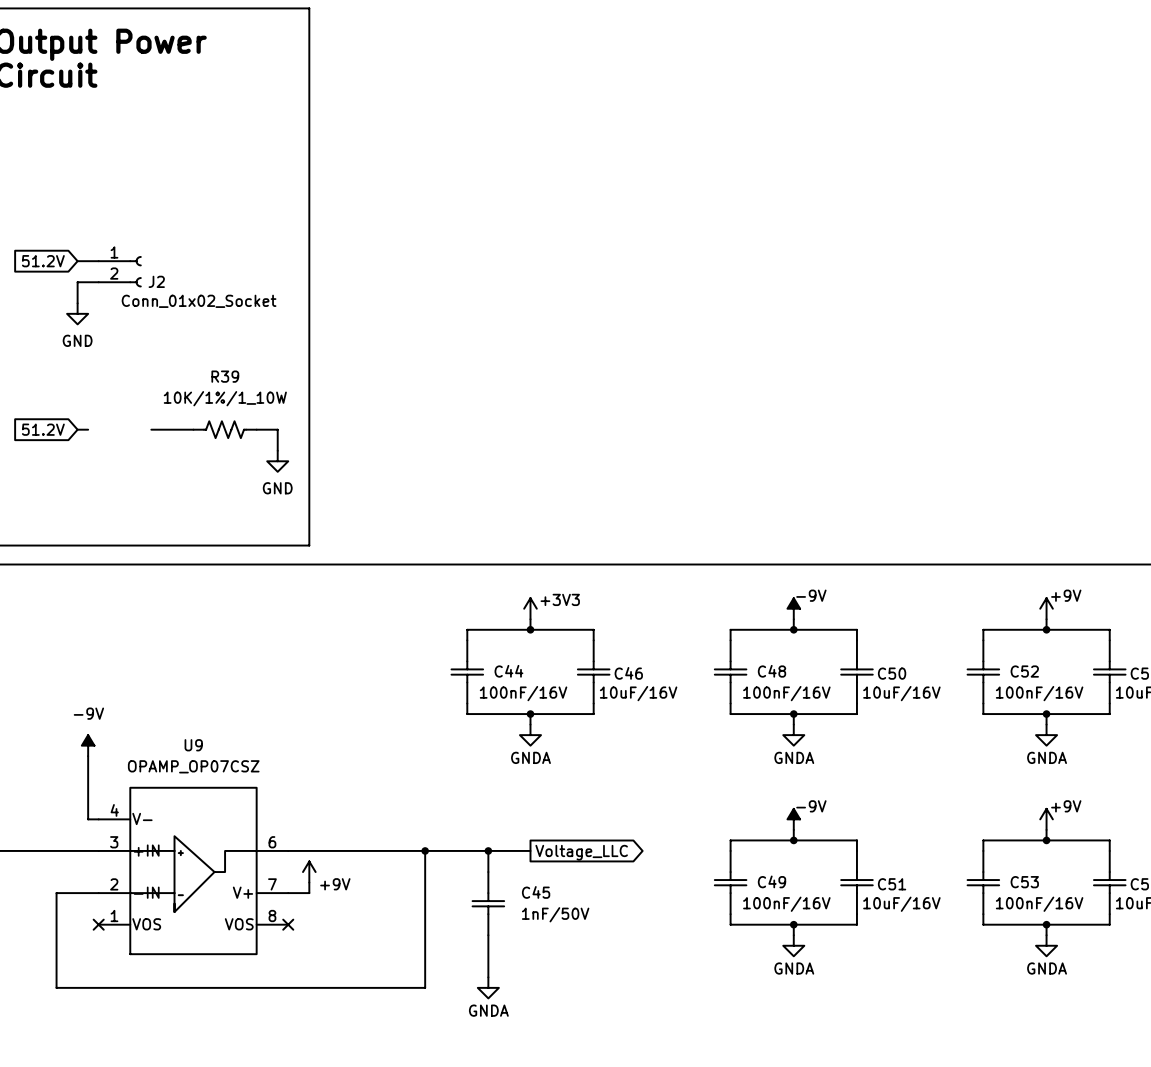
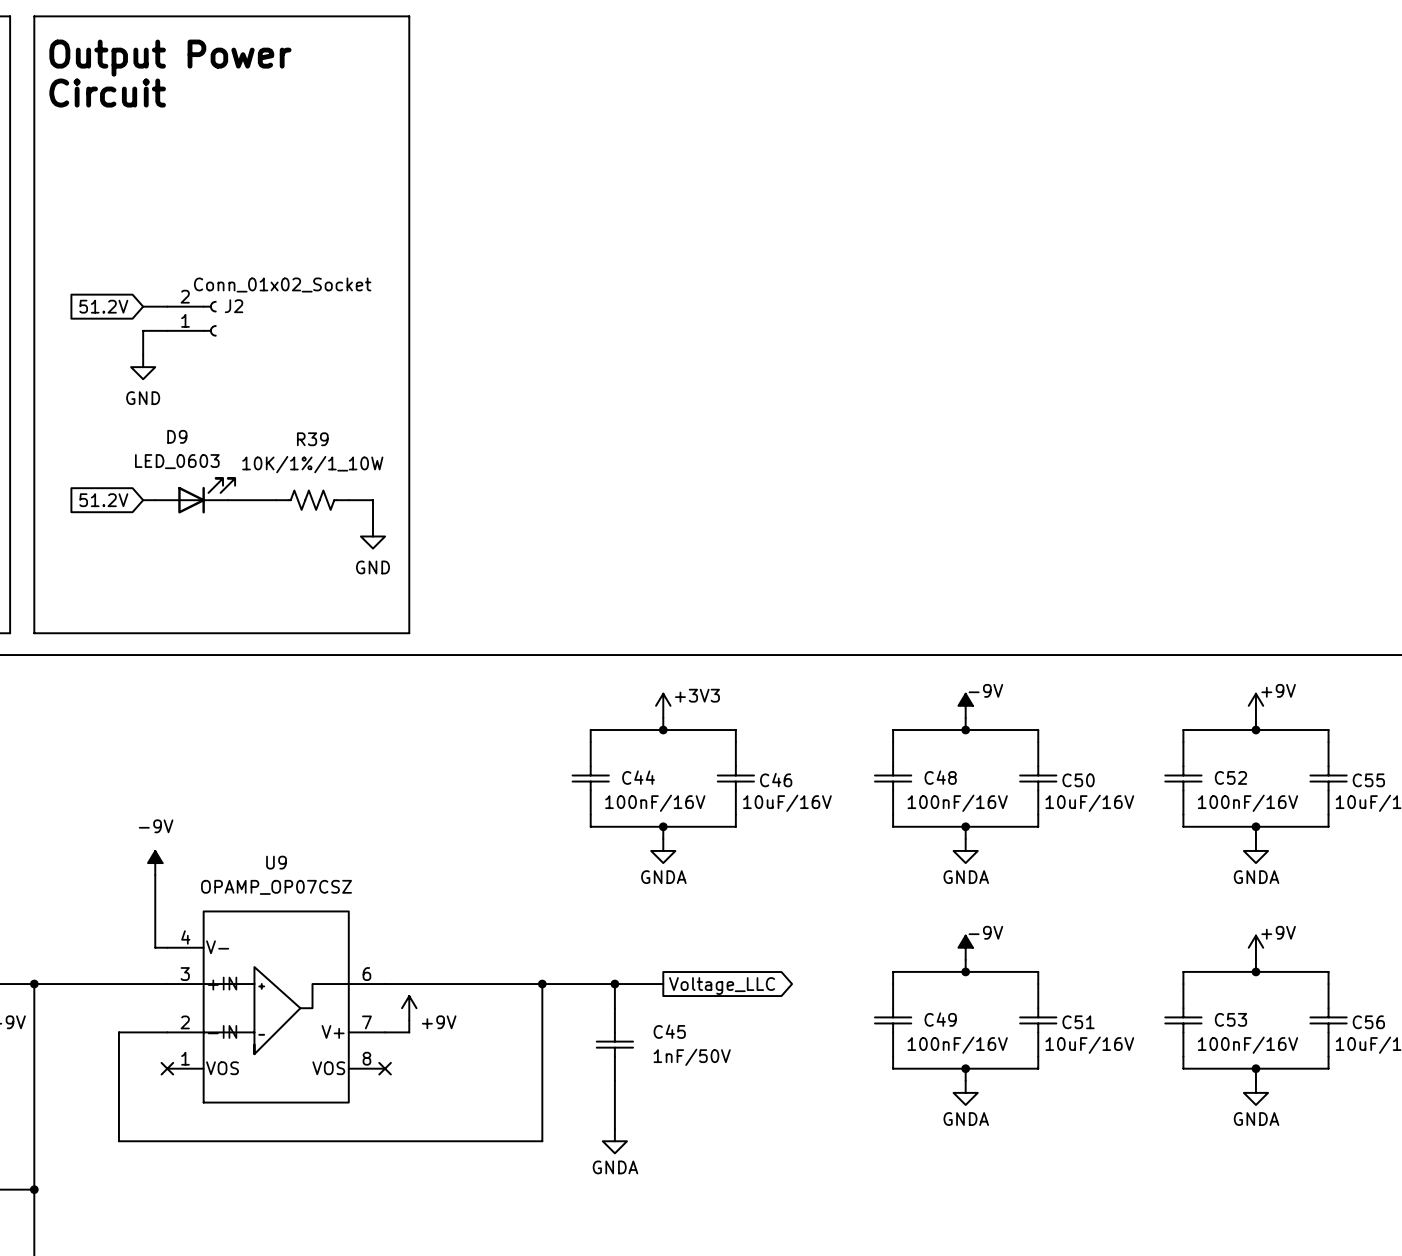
J2 flip: as is (135, 271) -> up-down (209, 318)
D9: none -> LED_0603 (195, 495)

